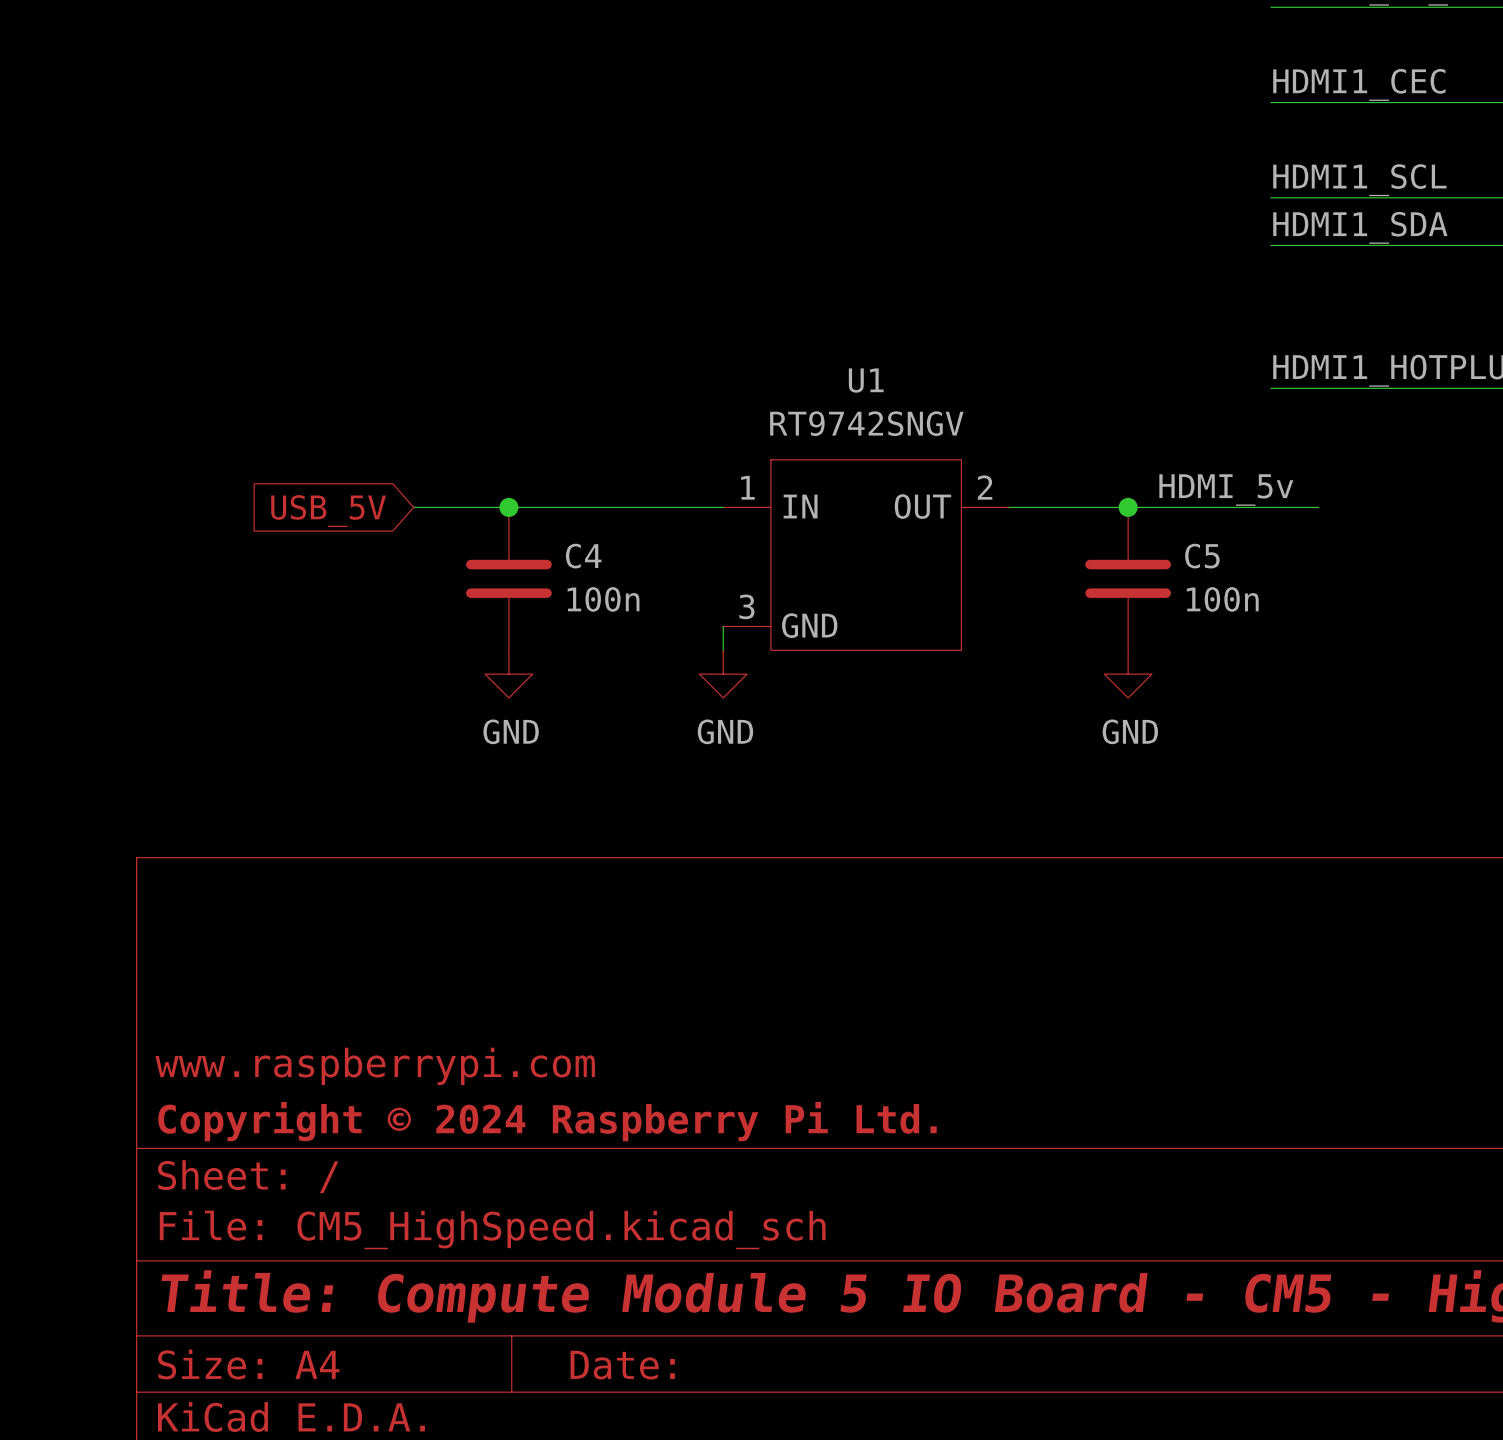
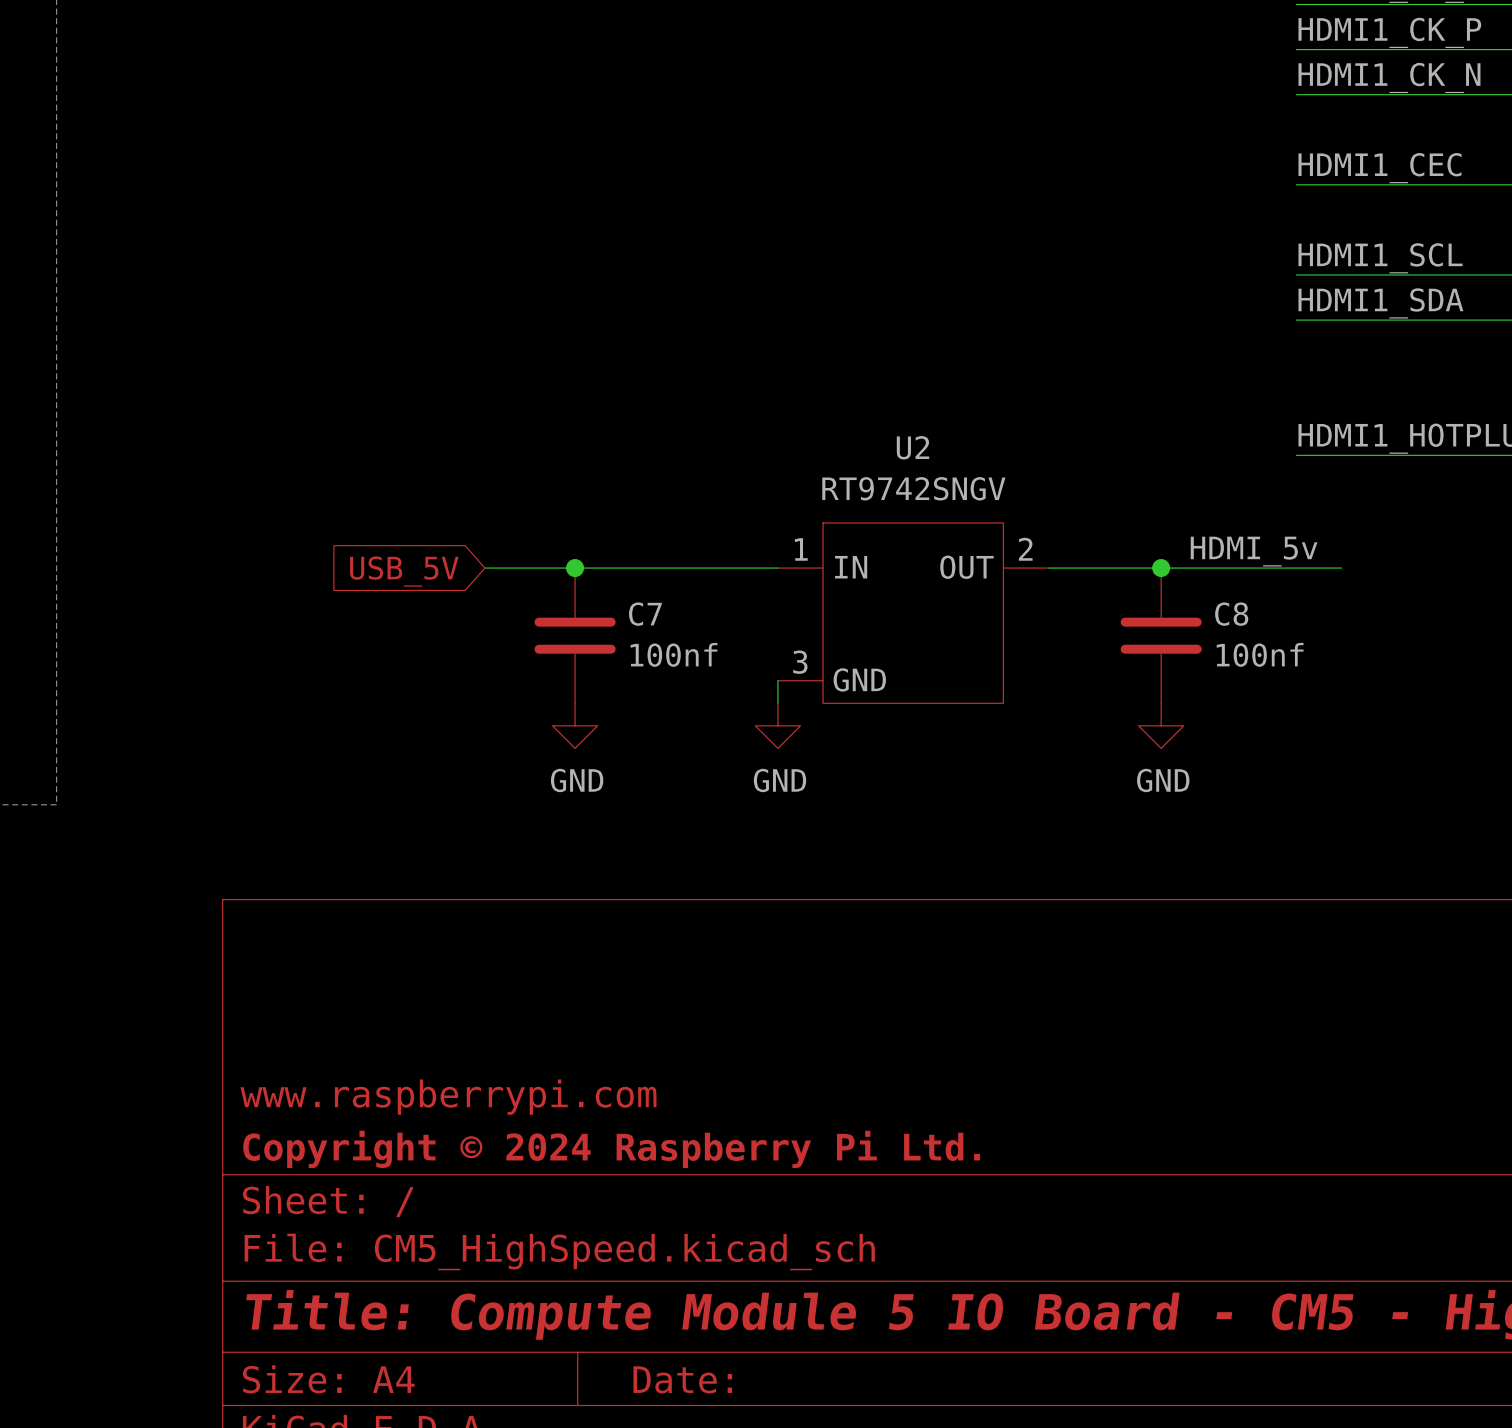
U1 name: U1 (866, 380) -> U2 (912, 447)
C4 name: C4 (583, 556) -> C7 (645, 614)
C5 name: C5 (1202, 556) -> C8 (1231, 614)
C4 value: 100n (603, 599) -> 100nf (674, 654)
C5 value: 100n (1222, 599) -> 100nf (1260, 654)

